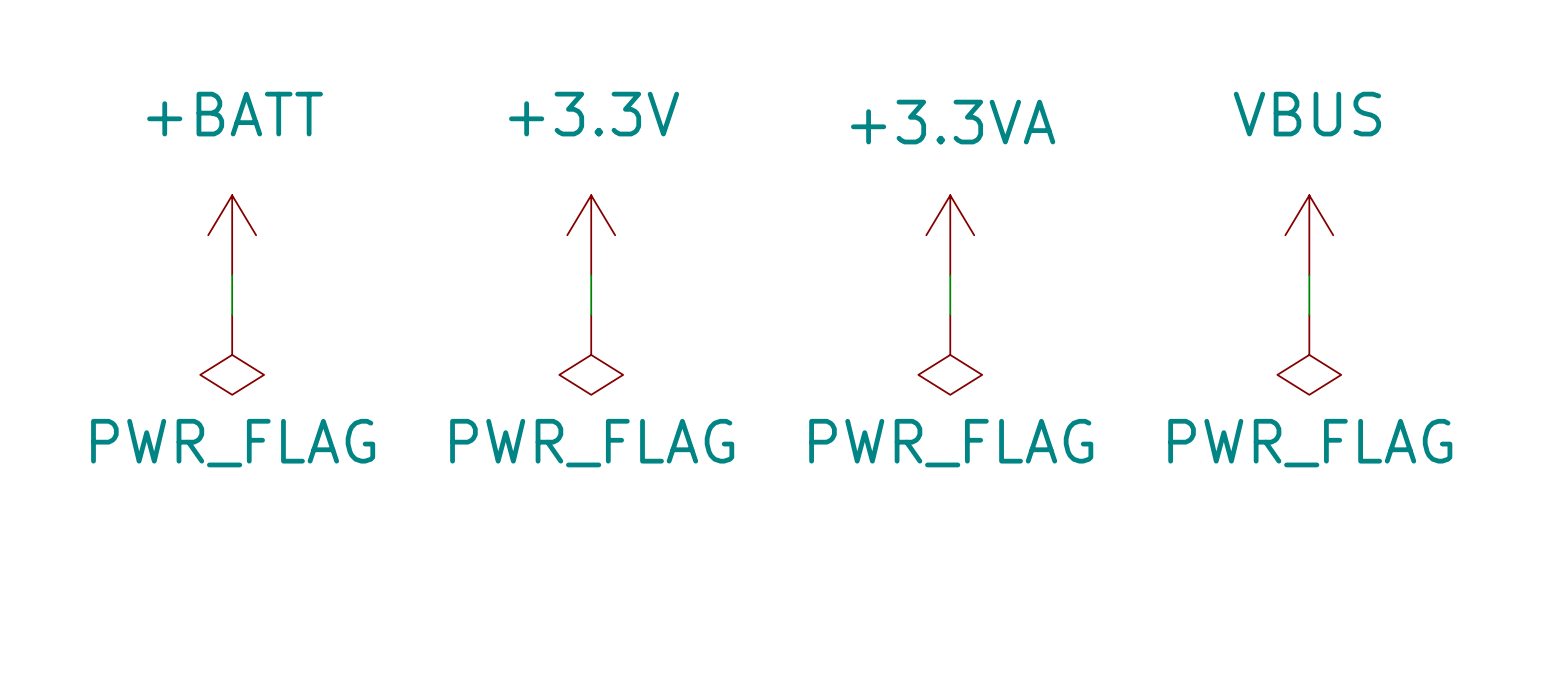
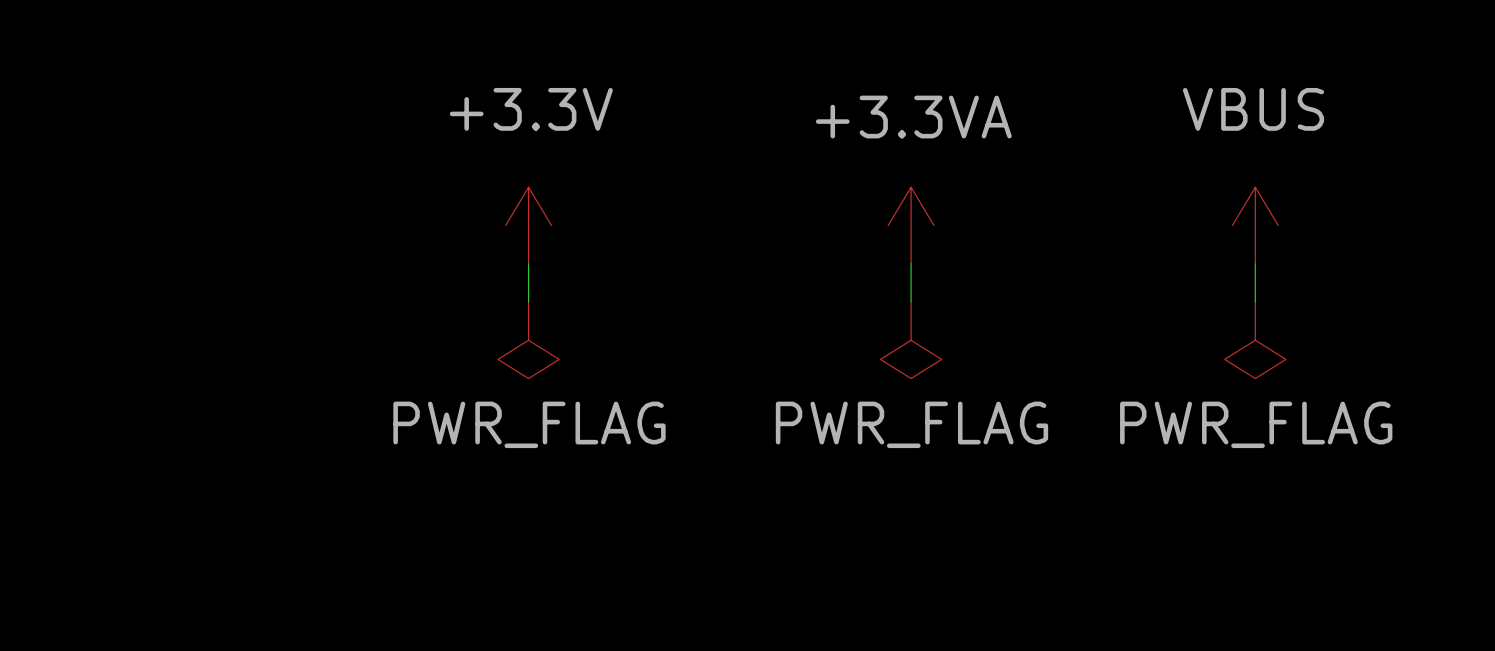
power symbol: +BATT (232, 235) -> none
power symbol position: +3.3V (591, 235) -> +3.3V (528, 225)
wire: (232, 275) (232, 315) -> none
wire: (591, 275) (591, 315) -> (528, 263) (528, 302)
power symbol: PWR_FLAG (232, 354) -> none
power symbol position: PWR_FLAG (591, 354) -> PWR_FLAG (528, 340)

